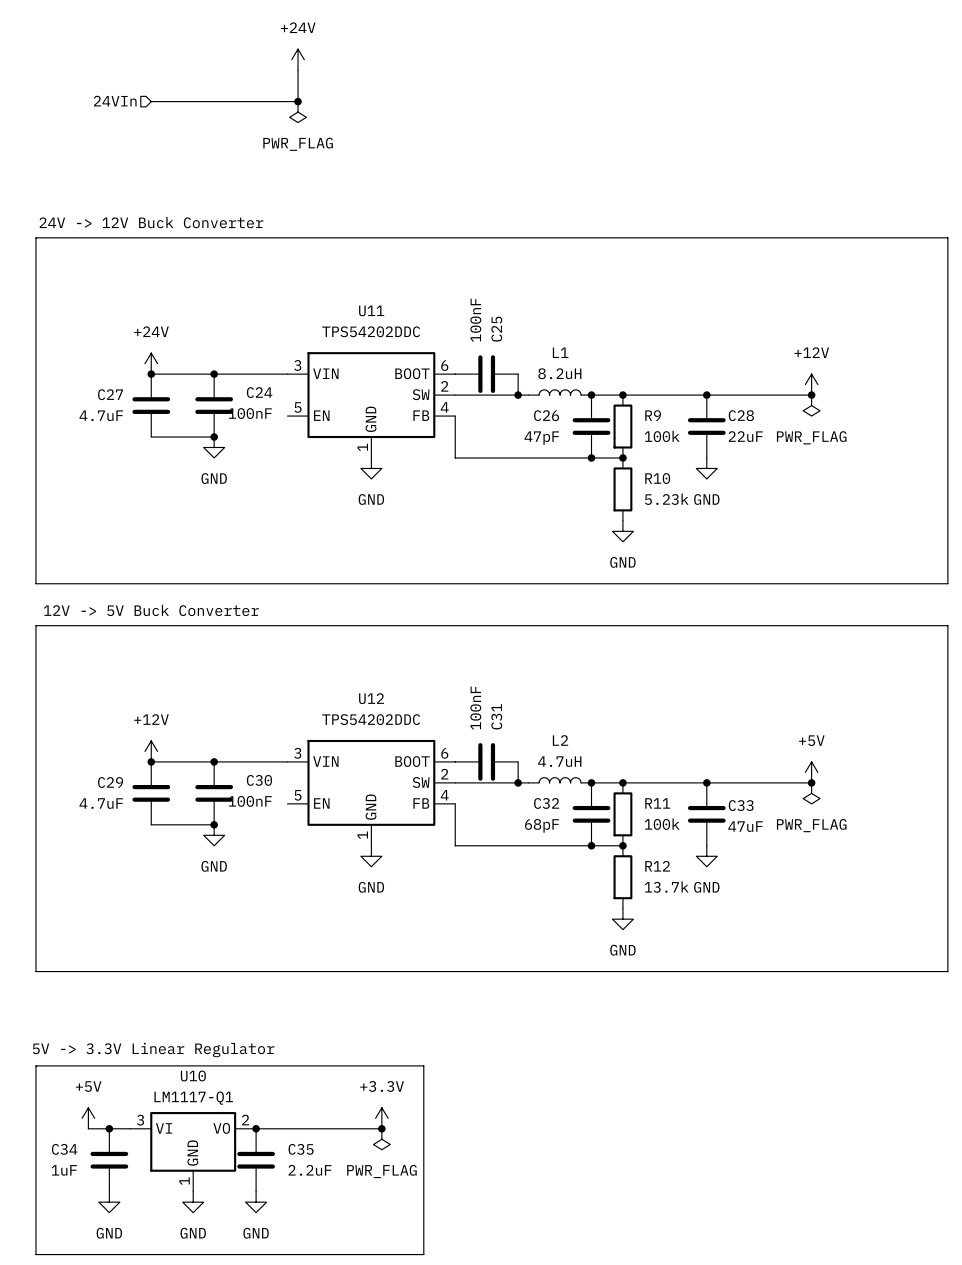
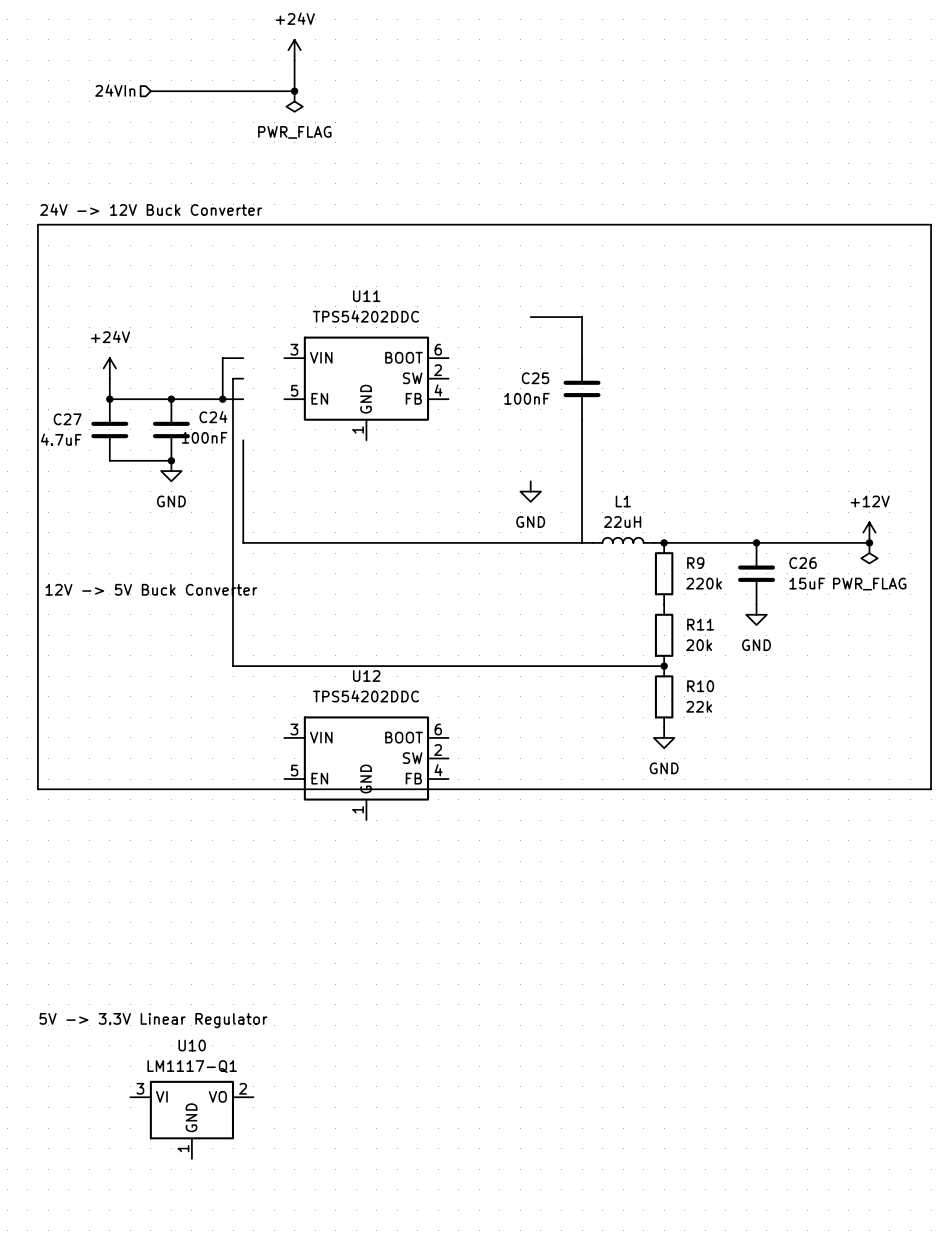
C25 value position: 100nF (475, 320) -> 100nF (526, 398)
C25 name position: C25 (496, 329) -> C25 (535, 378)
wire: none -> (530, 317) (582, 317) (582, 358)
power symbol position: +24V (151, 363) -> +24V (109, 368)
L1 value: 8.2uH (559, 373) -> 22uH (622, 522)
wire: (151, 374) (224, 374) -> (222, 399) (222, 358)
junction: (151, 374) -> none
junction: (214, 374) -> none
wire: (245, 374) (287, 374) -> none
C25 rotation: 0° (486, 374) -> 90° clockwise (582, 388)
C25 position: (486, 374) -> (582, 388)
wire: (518, 374) (518, 395) -> none
power symbol position: +12V (811, 384) -> +12V (869, 532)
L1 position: (560, 392) -> (623, 540)
wire: none -> (109, 378) (109, 399) (243, 399)
wire: none -> (243, 378) (233, 378) (233, 666) (664, 666)
wire: (455, 395) (528, 395) -> none
junction: (518, 395) -> none
wire: (591, 395) (811, 395) -> (653, 542) (869, 542)
junction: (591, 395) -> none
junction: (622, 395) -> none
junction: (706, 395) -> none
junction: (811, 395) -> none
C27 position: (151, 405) -> (109, 429)
C24 position: (214, 405) -> (171, 429)
power symbol: PWR_FLAG (811, 405) -> none
C26 name position: C26 (546, 415) -> C26 (803, 563)
junction: none -> (109, 399)
junction: none -> (171, 399)
junction: none -> (222, 399)
wire: (455, 416) (455, 457) (622, 457) -> none
C26 position: (591, 426) -> (756, 573)
R9 position: (622, 426) -> (664, 573)
C28: 22uF (706, 426) -> none
R9 value: 100k (662, 436) -> 220k (704, 583)
wire: (151, 437) (214, 437) -> (109, 460) (171, 460)
junction: (214, 437) -> none
wire: none -> (582, 419) (582, 542)
C26 value: 47pF (541, 438) -> 15uF (807, 583)
power symbol position: GND (214, 447) -> GND (171, 471)
wire: none -> (243, 440) (243, 542) (592, 542)
junction: (591, 457) -> none
junction: (622, 457) -> none
power symbol: GND (371, 468) -> none
power symbol: GND (706, 468) -> none
junction: none -> (171, 460)
R10 position: (622, 489) -> (664, 696)
R10 value: 5.23k (666, 499) -> 22k (699, 706)
power symbol: none -> GND (530, 491)
power symbol: GND (622, 531) -> none
junction: none -> (664, 542)
junction: none -> (756, 542)
junction: none -> (869, 542)
power symbol: none -> PWR_FLAG (869, 553)
line: (35, 583) (947, 583) -> (37, 563) (37, 604)
line: (35, 625) (947, 625) -> (931, 563) (931, 604)
power symbol: none -> GND (756, 614)
junction: none -> (664, 666)
power symbol: +12V (151, 751) -> none
wire: (151, 761) (287, 761) -> none
junction: (151, 761) -> none
junction: (214, 761) -> none
C31: 100nF (486, 761) -> none
wire: (518, 761) (518, 782) -> none
power symbol: none -> GND (664, 737)
power symbol: +5V (811, 772) -> none
L2: 4.7uH (560, 780) -> none
wire: (455, 782) (528, 782) -> none
junction: (518, 782) -> none
wire: (591, 782) (811, 782) -> none
junction: (591, 782) -> none
junction: (622, 782) -> none
junction: (706, 782) -> none
junction: (811, 782) -> none
C29: 4.7uF (151, 793) -> none
C30: 100nF (214, 793) -> none
power symbol: PWR_FLAG (811, 793) -> none
wire: (455, 803) (455, 845) (622, 845) -> none
line: (35, 814) (35, 971) (947, 971) (947, 814) -> (37, 789) (931, 789)
C32: 68pF (591, 814) -> none
R11 position: (622, 814) -> (664, 635)
C33: 47uF (706, 814) -> none
wire: (151, 824) (214, 824) -> none
junction: (214, 824) -> none
R11 value: 100k (662, 824) -> 20k (699, 645)
power symbol: GND (214, 835) -> none
junction: (591, 845) -> none
junction: (622, 845) -> none
power symbol: GND (371, 856) -> none
power symbol: GND (706, 856) -> none
R12: 13.7k (622, 877) -> none
power symbol: GND (622, 919) -> none
line: (35, 1065) (35, 1254) (423, 1254) (423, 1065) (35, 1065) -> none
power symbol: +5V (88, 1118) -> none
power symbol: +3.3V (381, 1118) -> none
wire: (88, 1128) (130, 1128) -> none
junction: (109, 1128) -> none
wire: (256, 1128) (381, 1128) -> none
junction: (256, 1128) -> none
junction: (381, 1128) -> none
power symbol: PWR_FLAG (381, 1139) -> none
C34: 1uF (109, 1160) -> none
C35: 2.2uF (256, 1160) -> none
power symbol: GND (109, 1202) -> none
power symbol: GND (193, 1202) -> none
power symbol: GND (256, 1202) -> none

